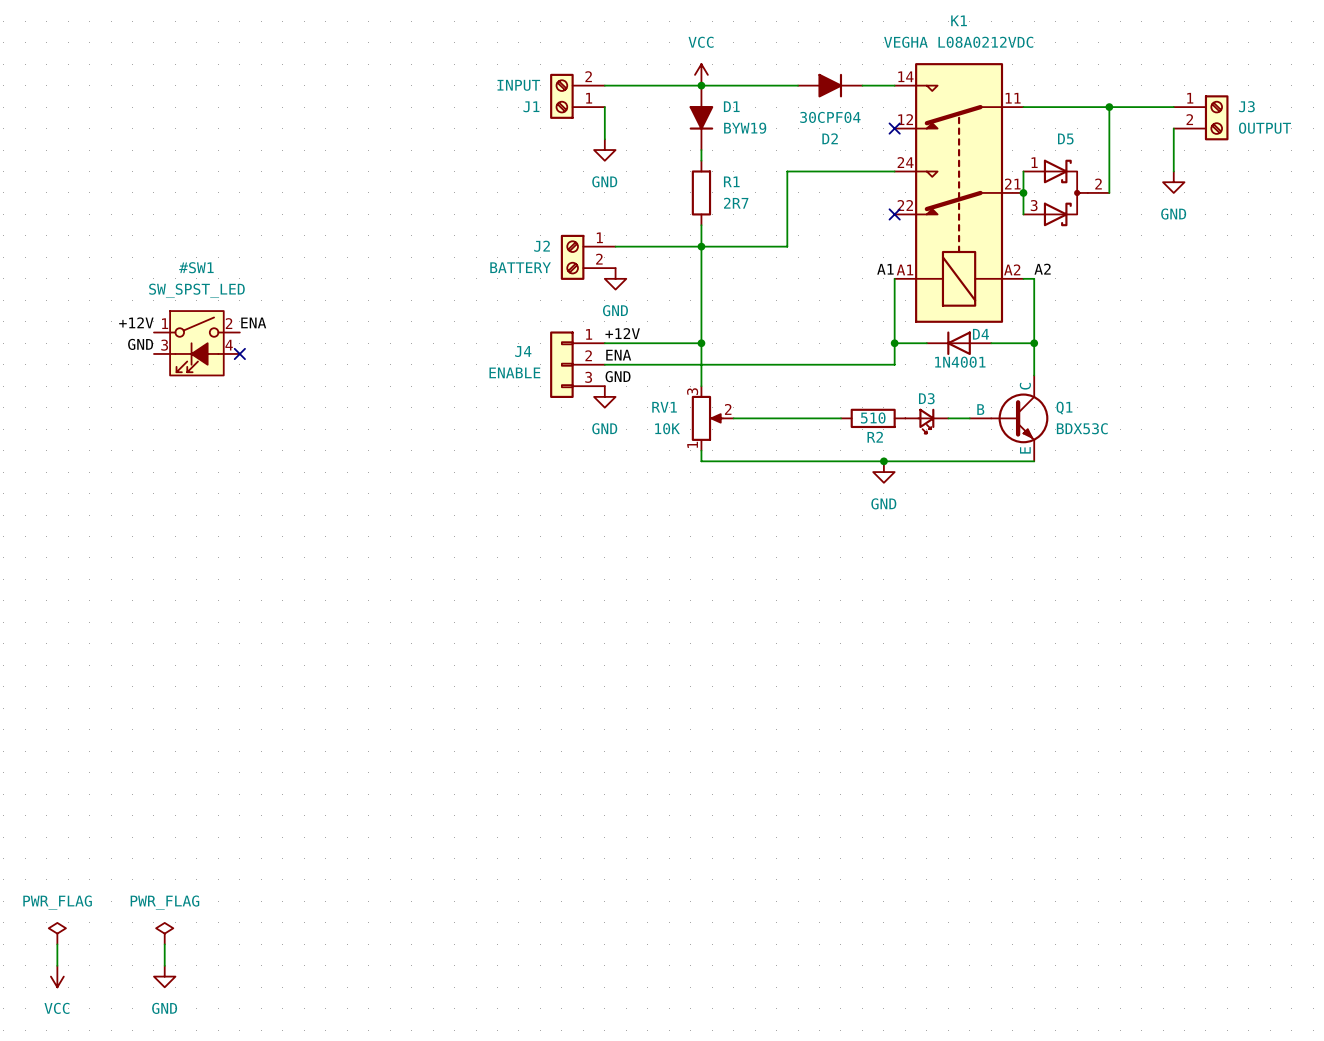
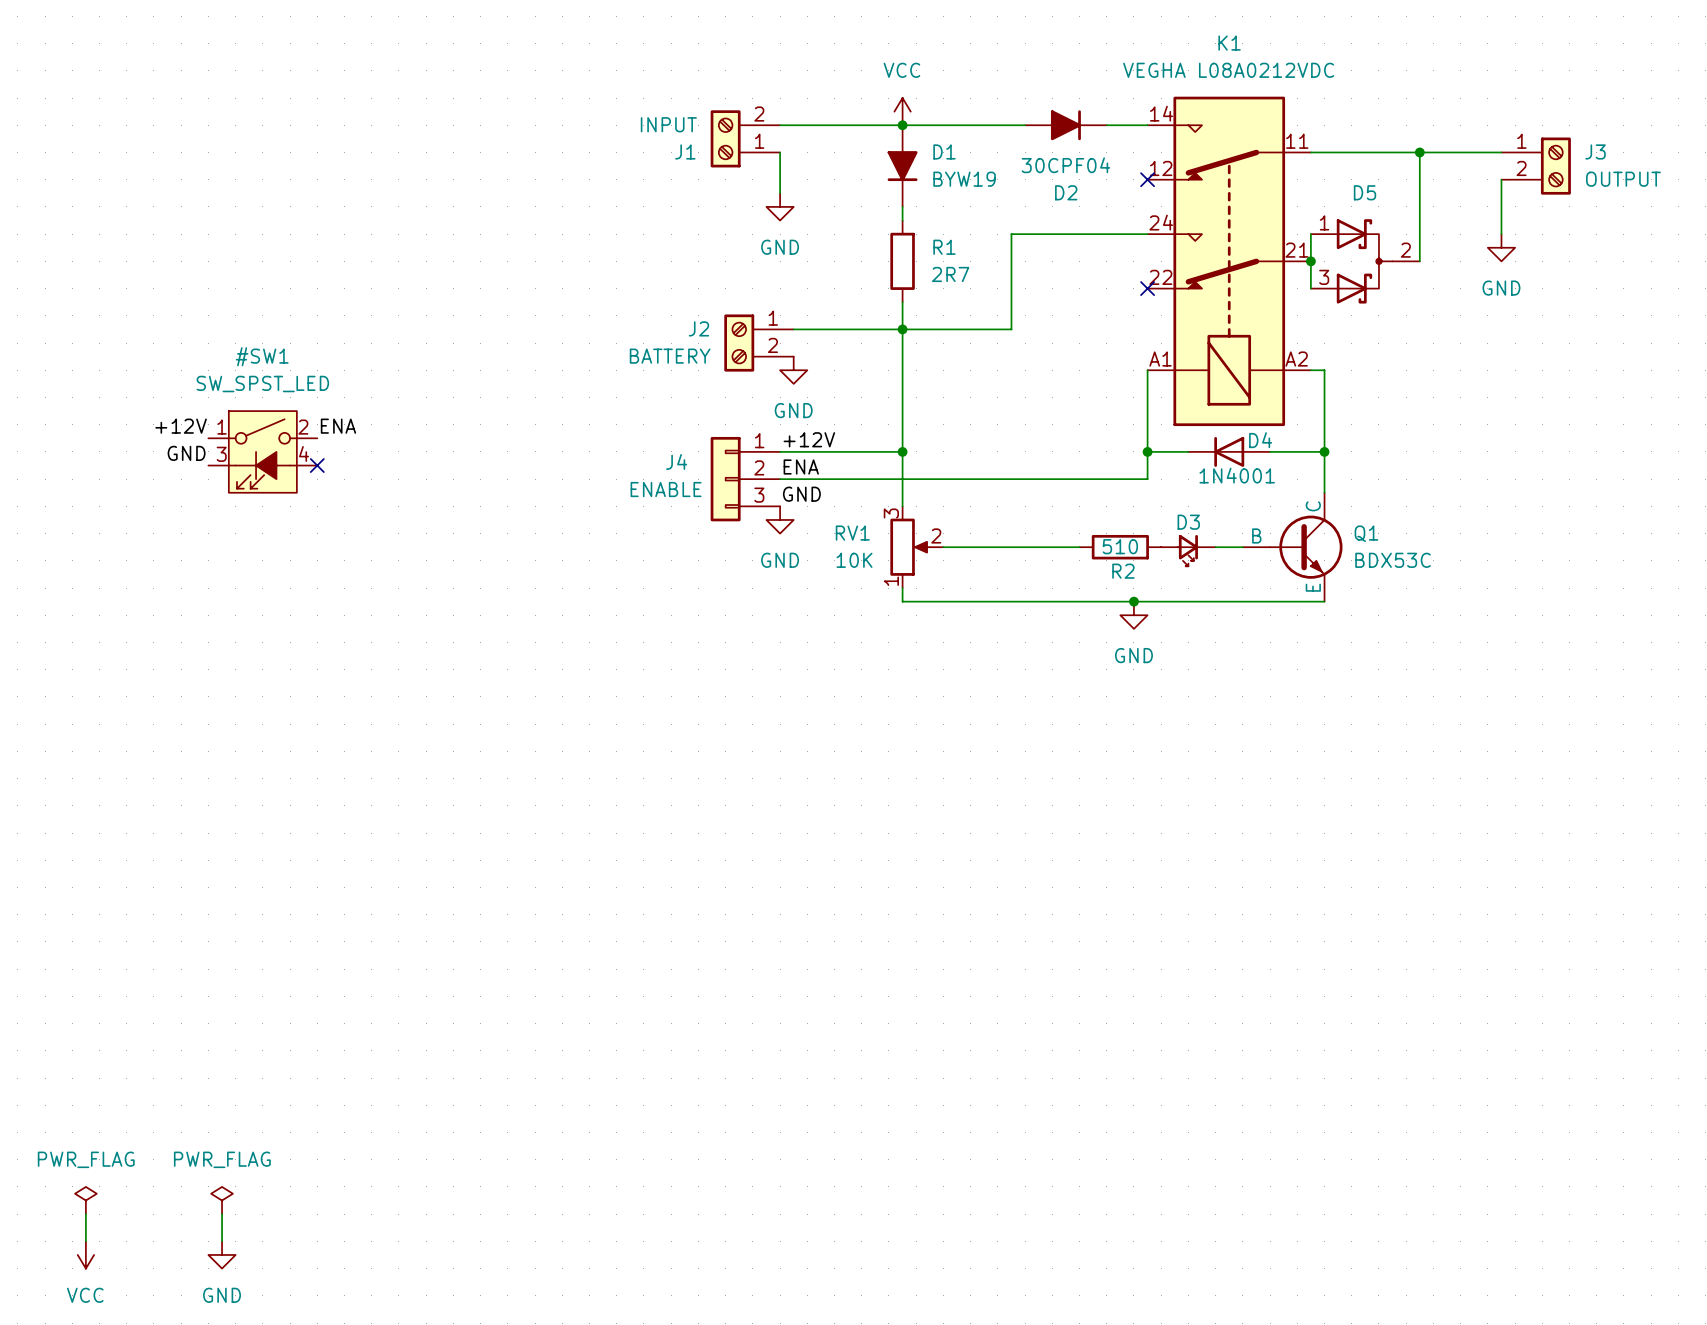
label: A1 (885, 269) -> none
label: A2 (1042, 269) -> none

